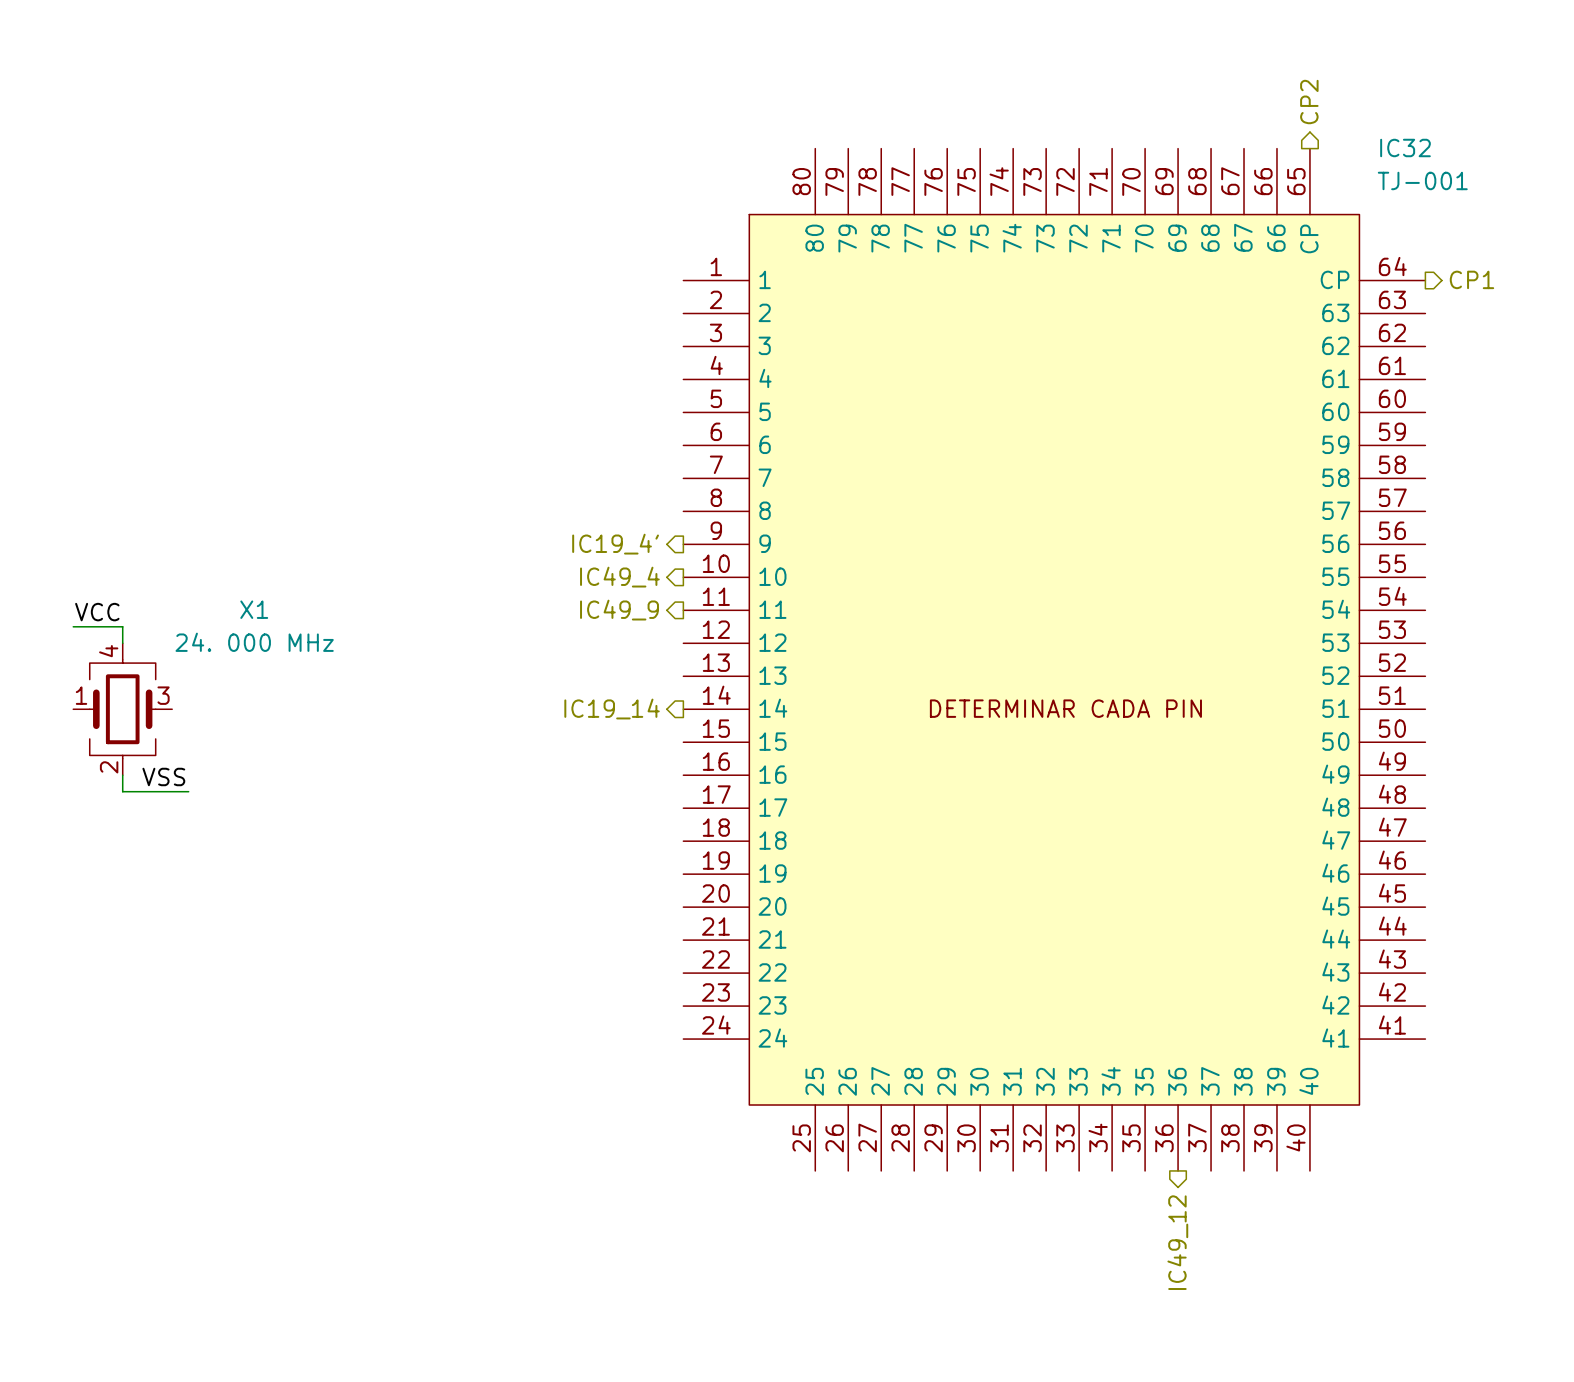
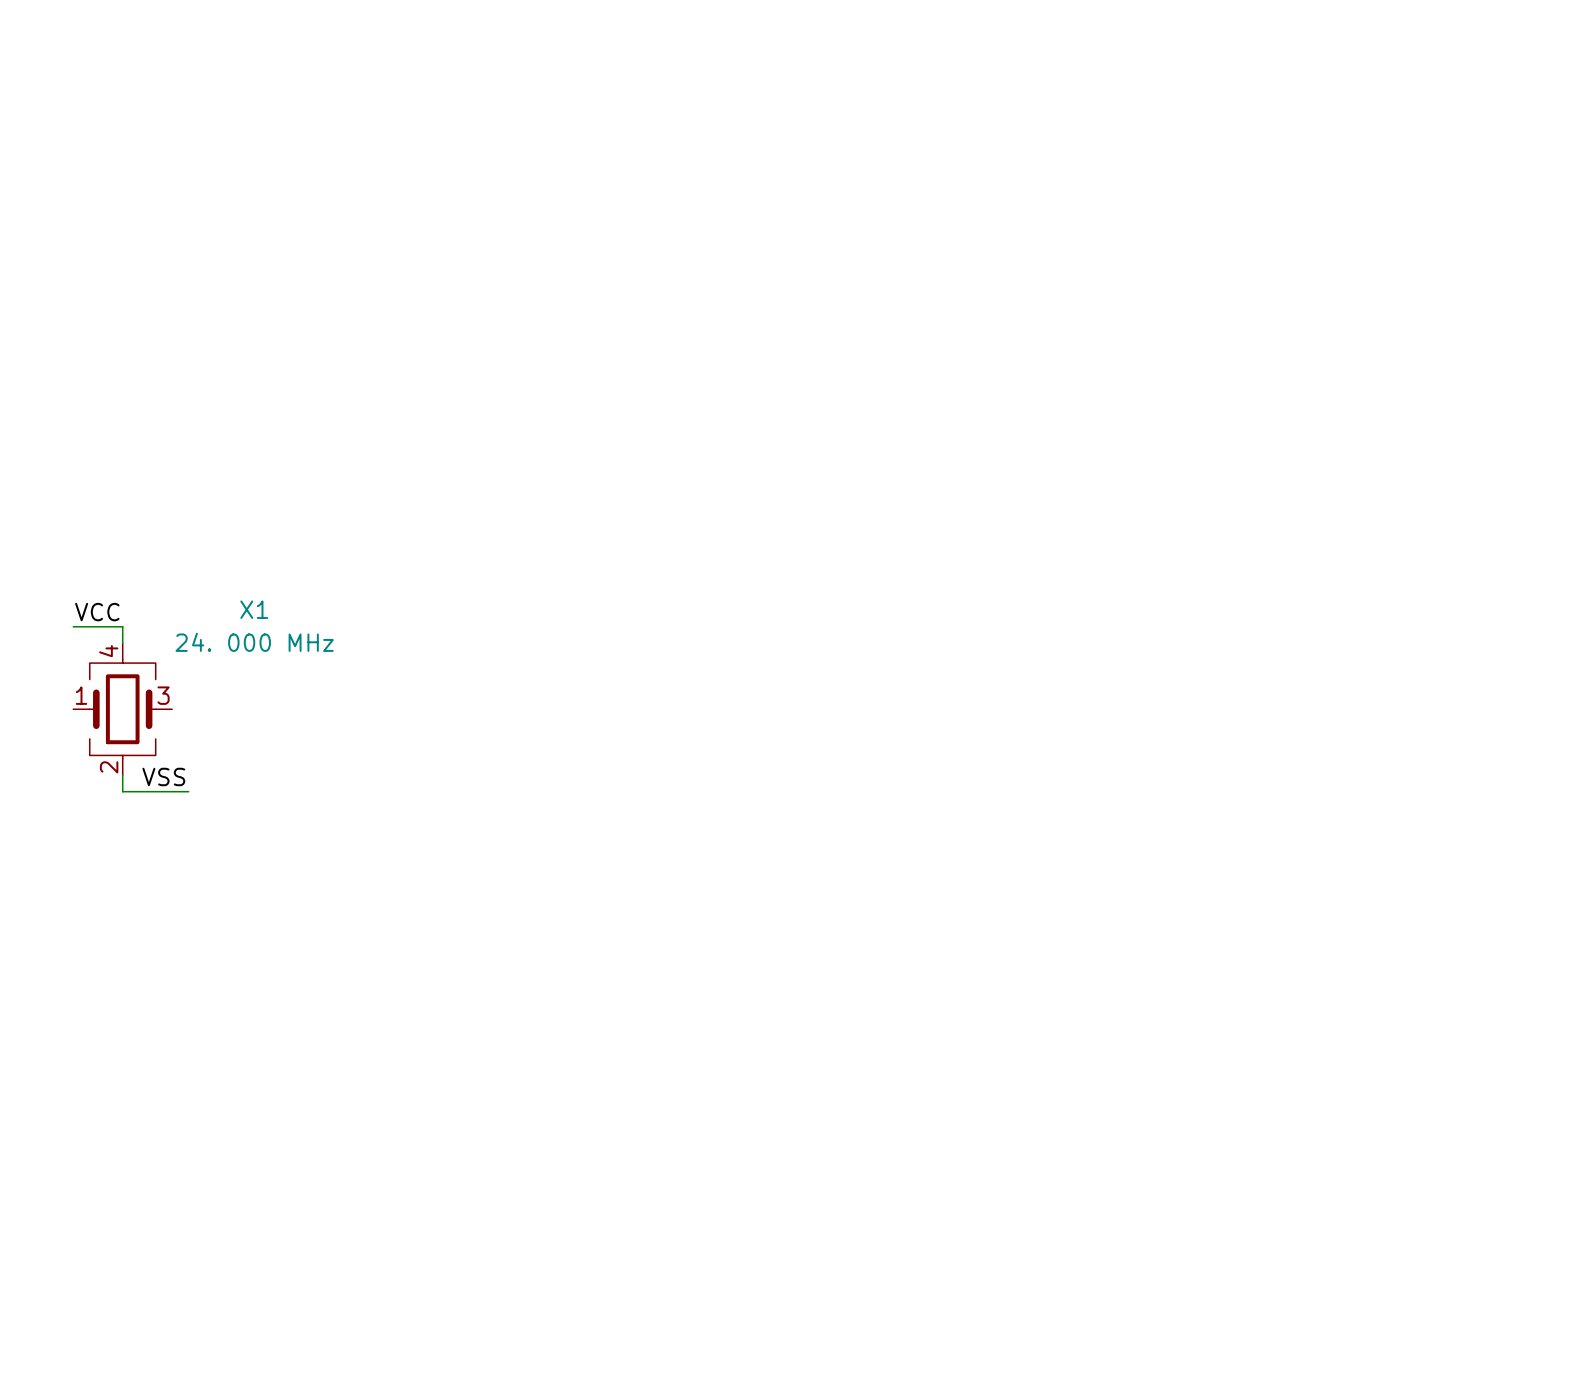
hierarchical label: CP2 (1309, 102) -> none
hierarchical label: CP1 (1471, 279) -> none
hierarchical label: IC19_4' (615, 544) -> none
hierarchical label: IC49_4 (619, 577) -> none
hierarchical label: IC49_9 (619, 610) -> none
IC32: TJ-001 (1054, 659) -> none
hierarchical label: IC19_14 (612, 709) -> none
hierarchical label: IC49_12 (1177, 1242) -> none

